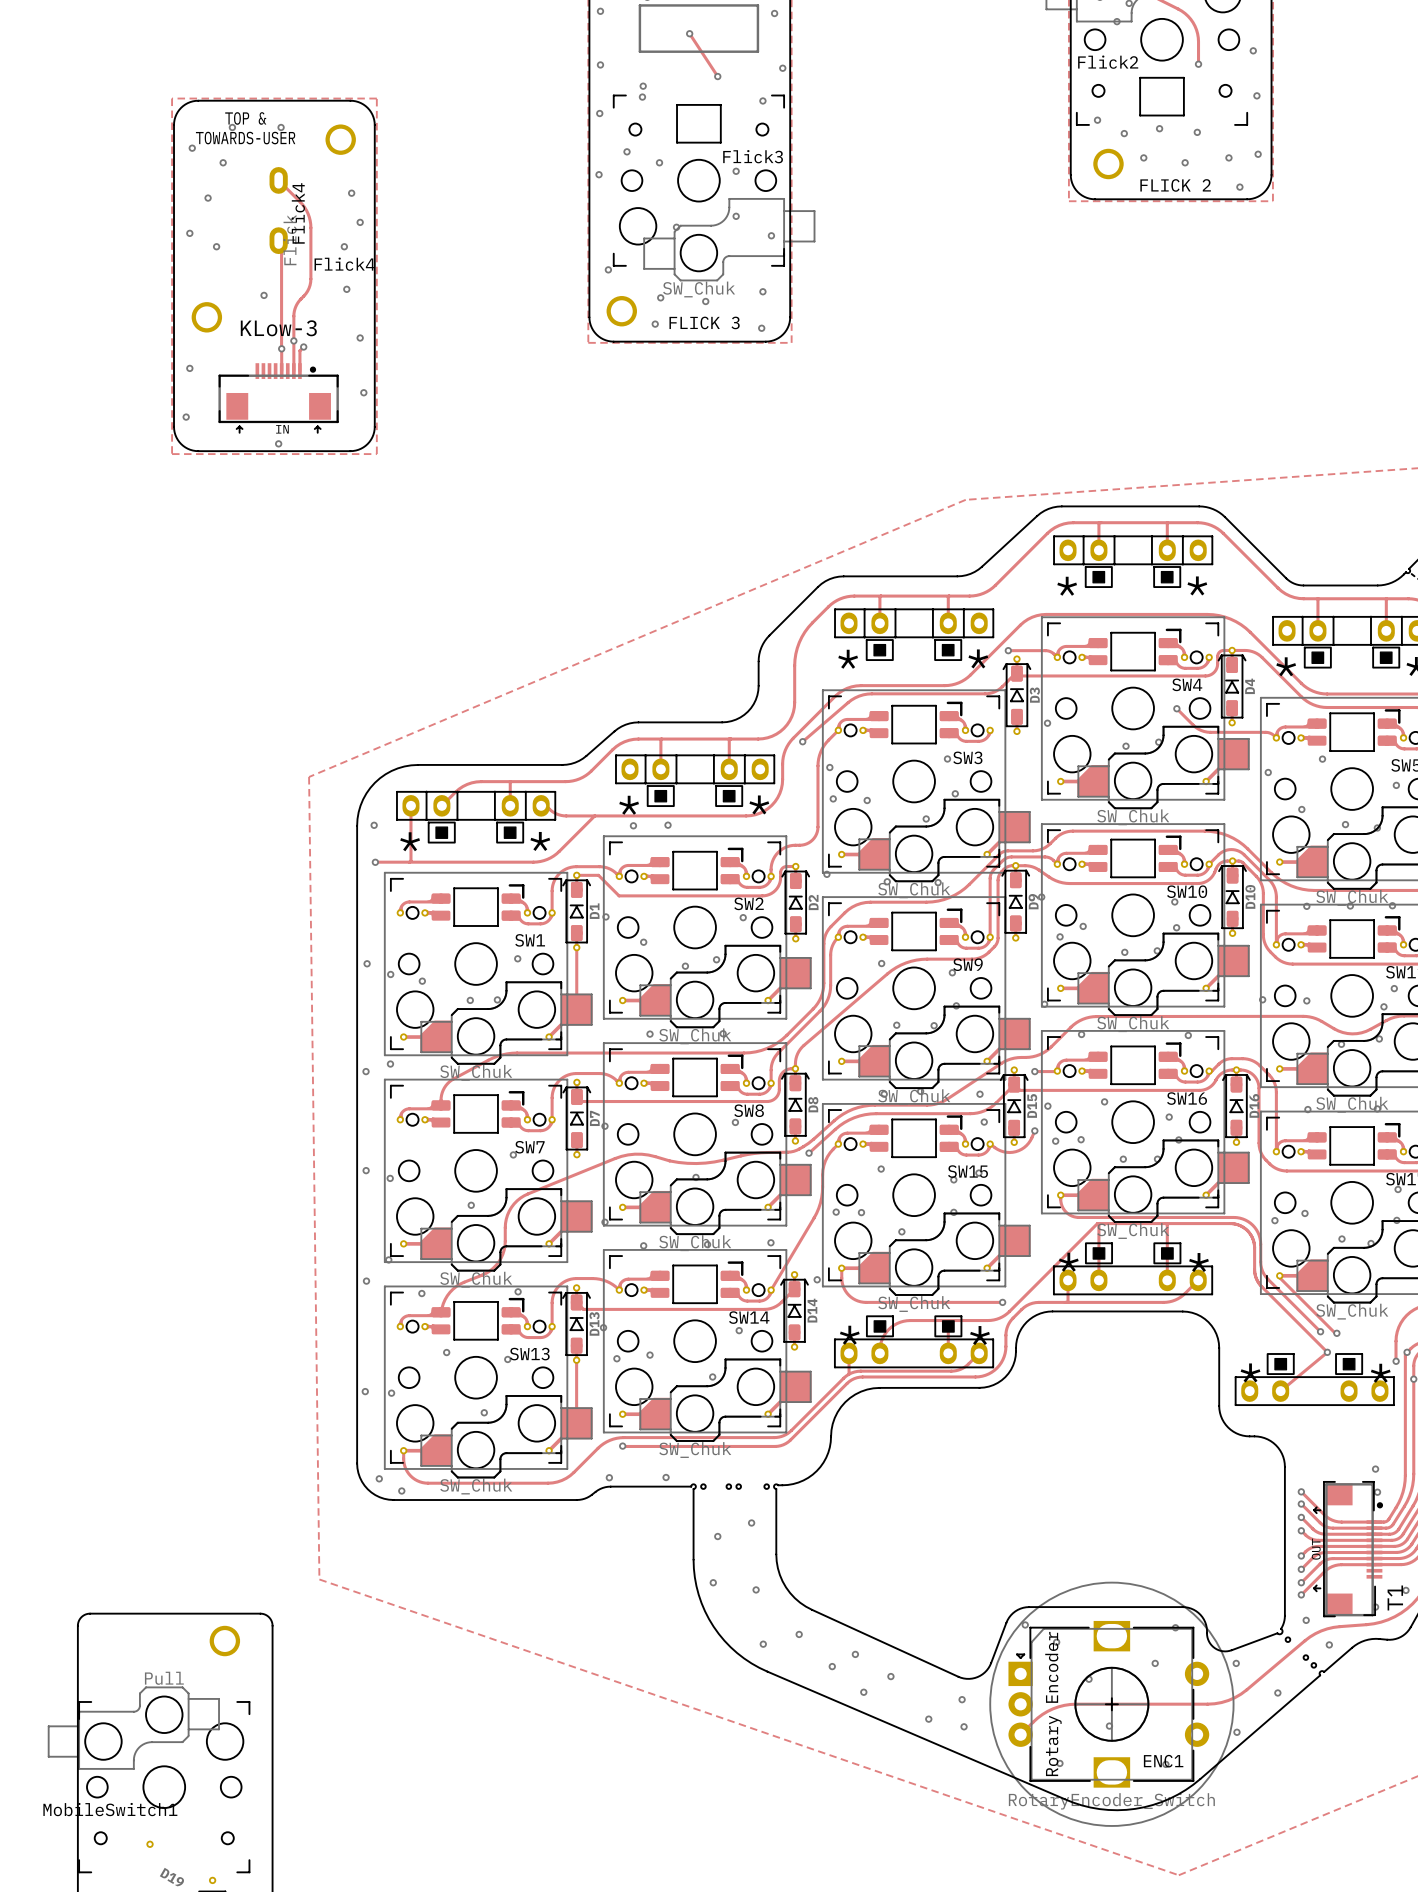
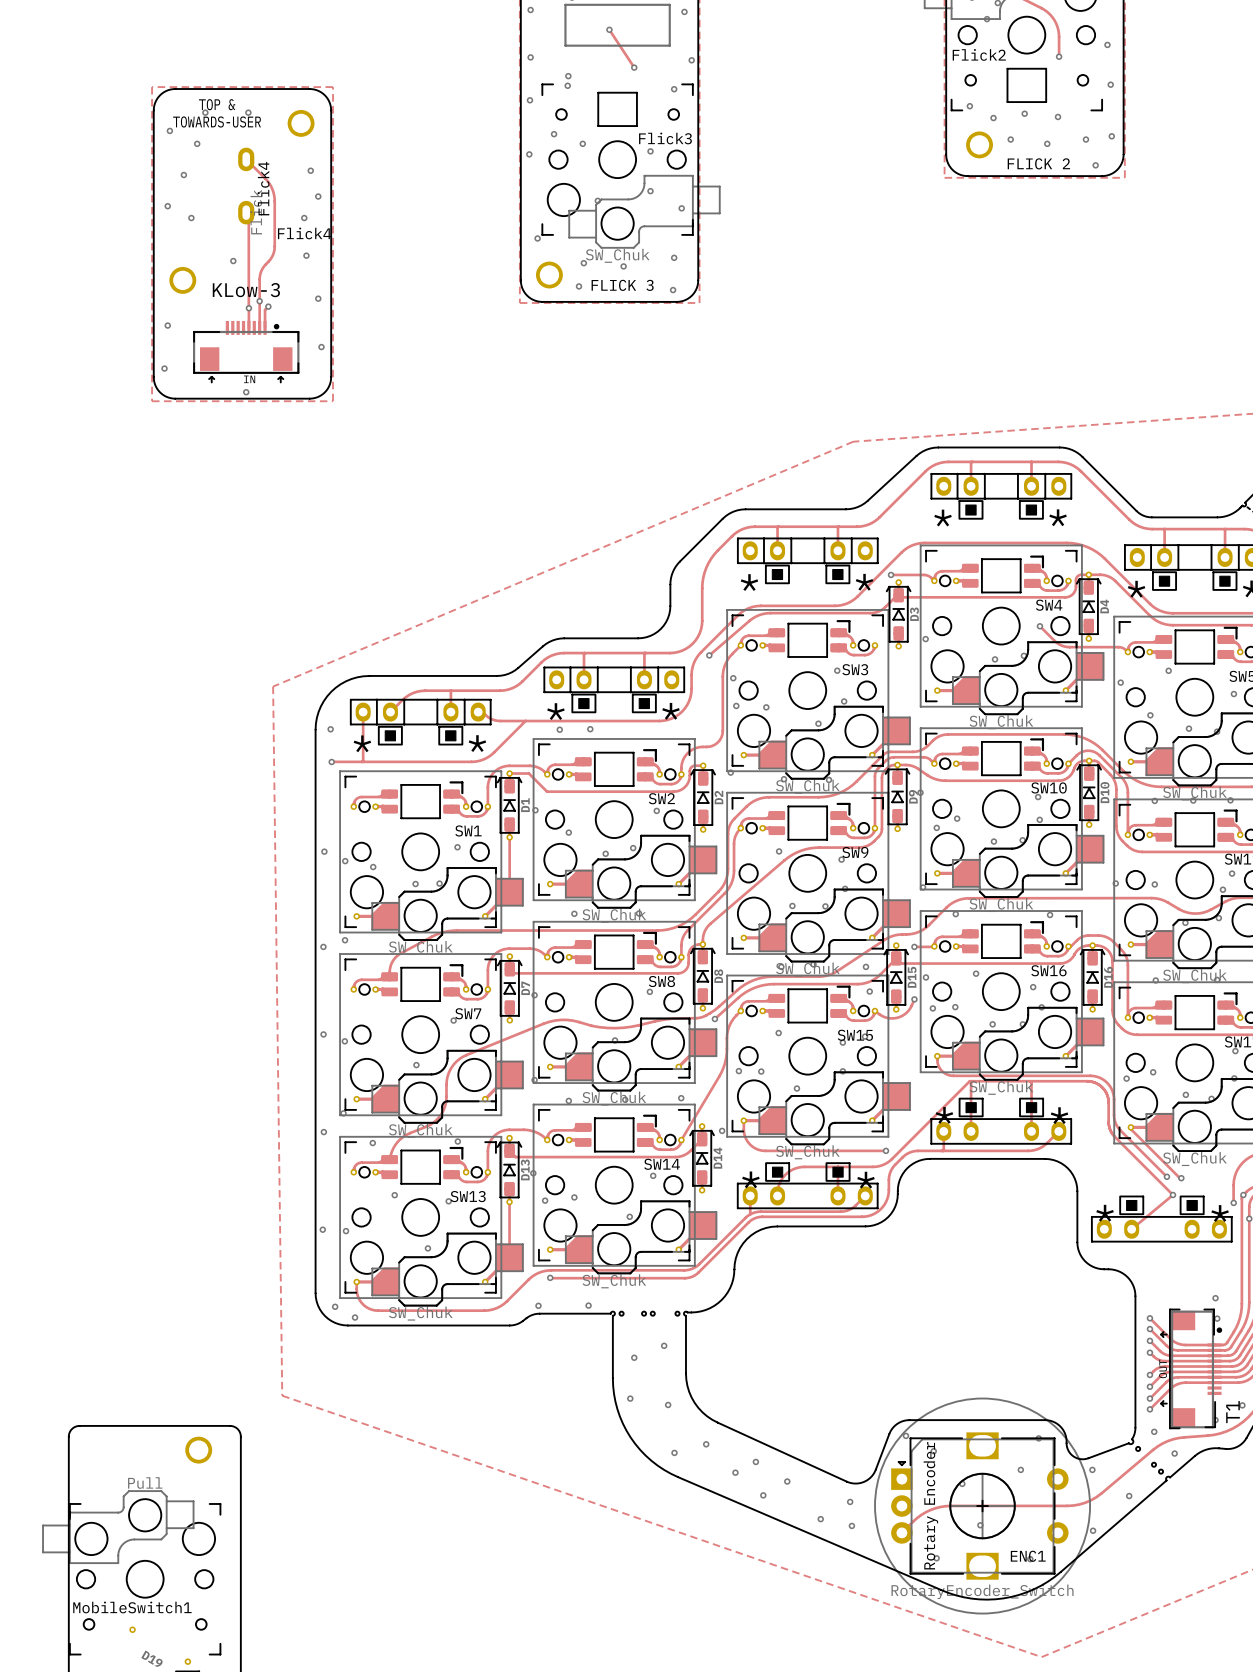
MobileSwitch1 name position: MobileSwitch1 (110, 1809) -> MobileSwitch1 (132, 1607)

